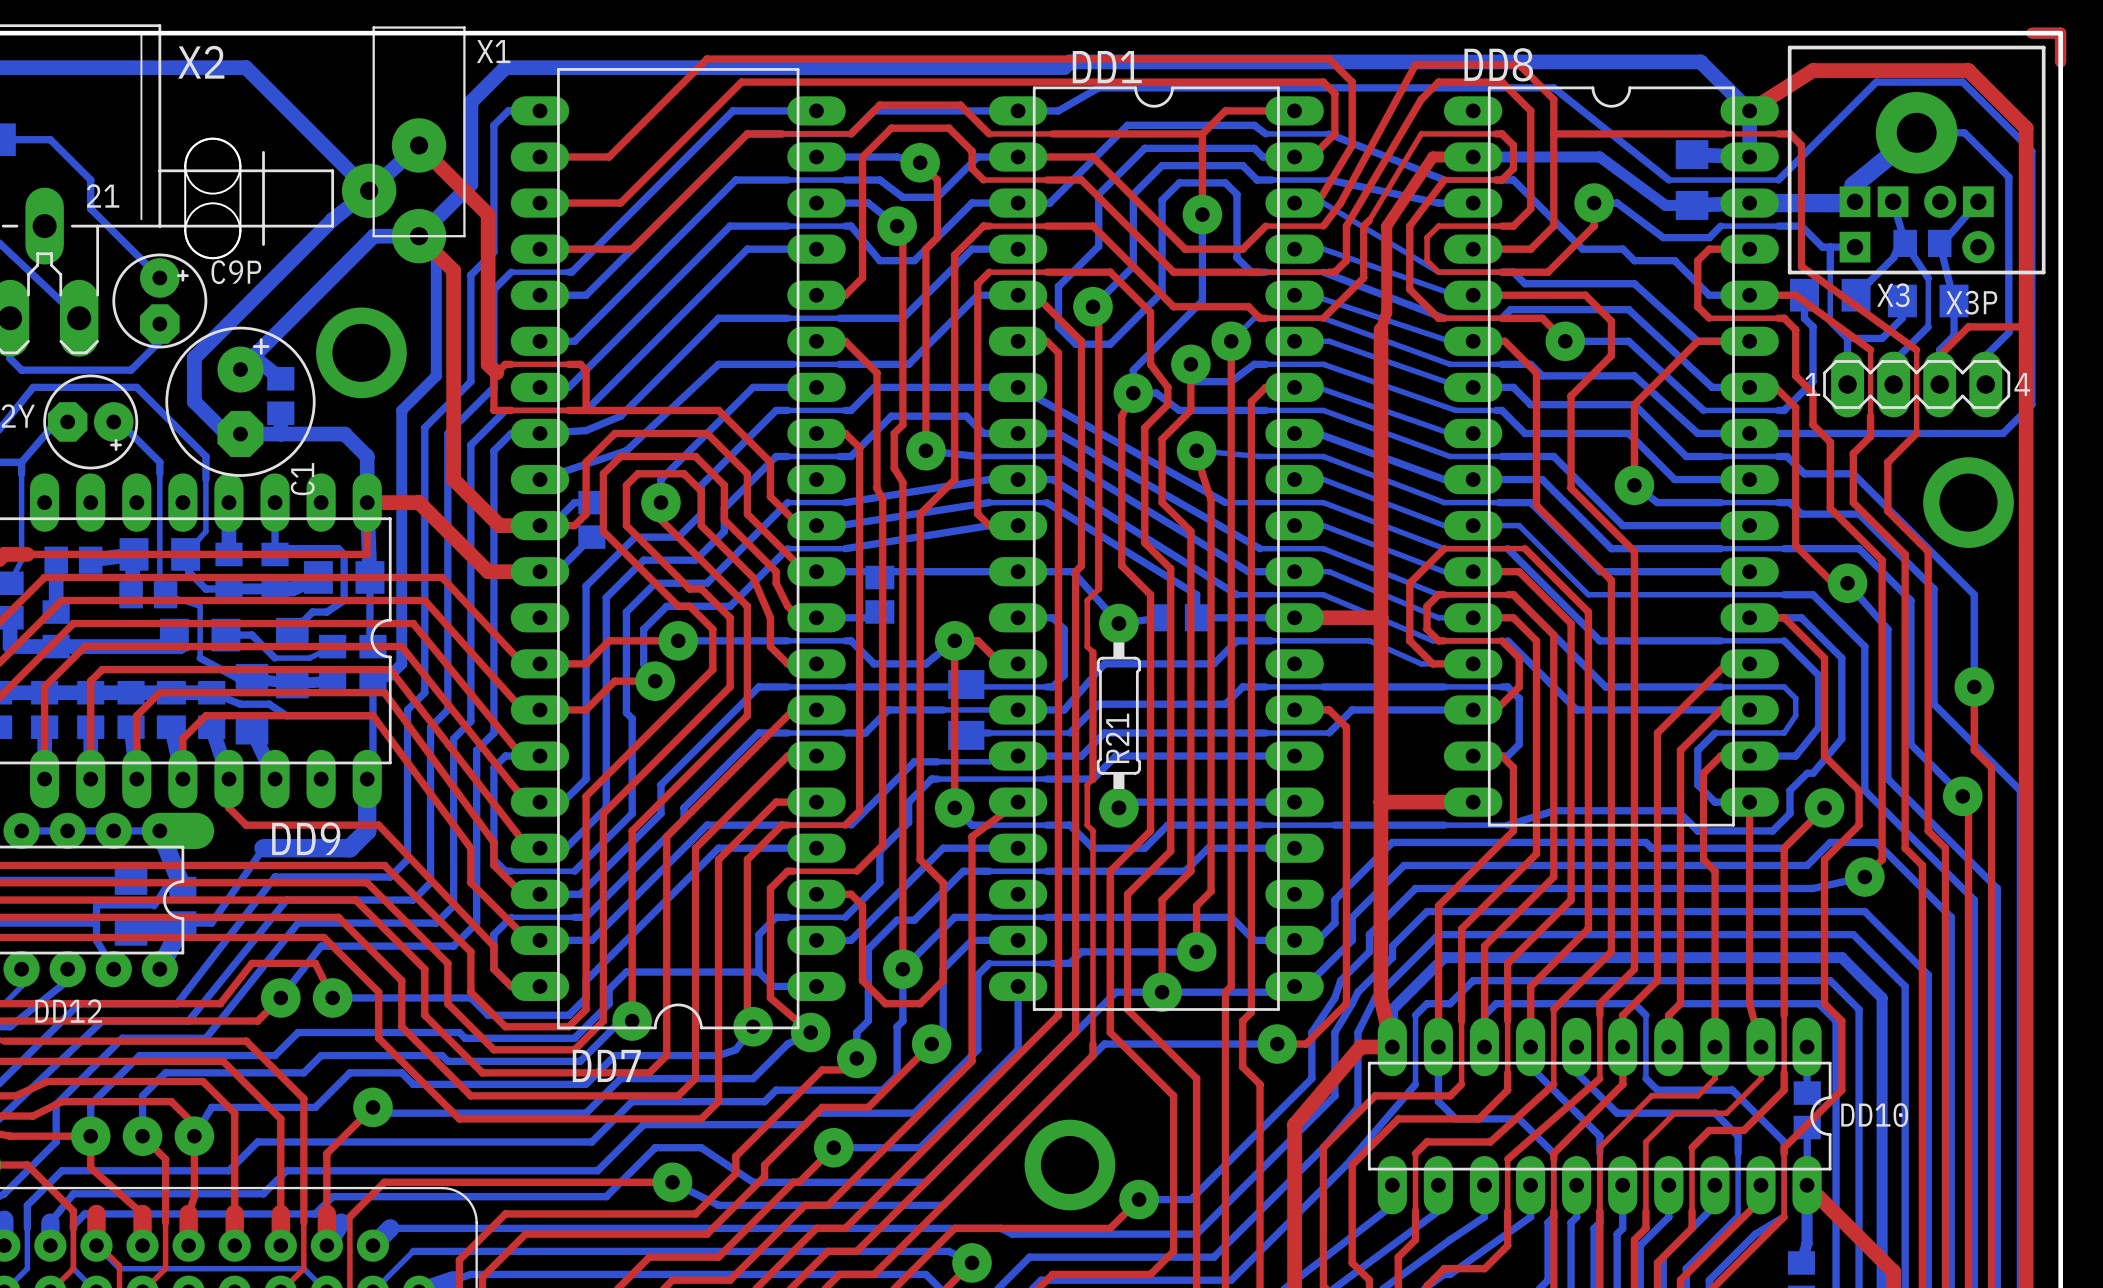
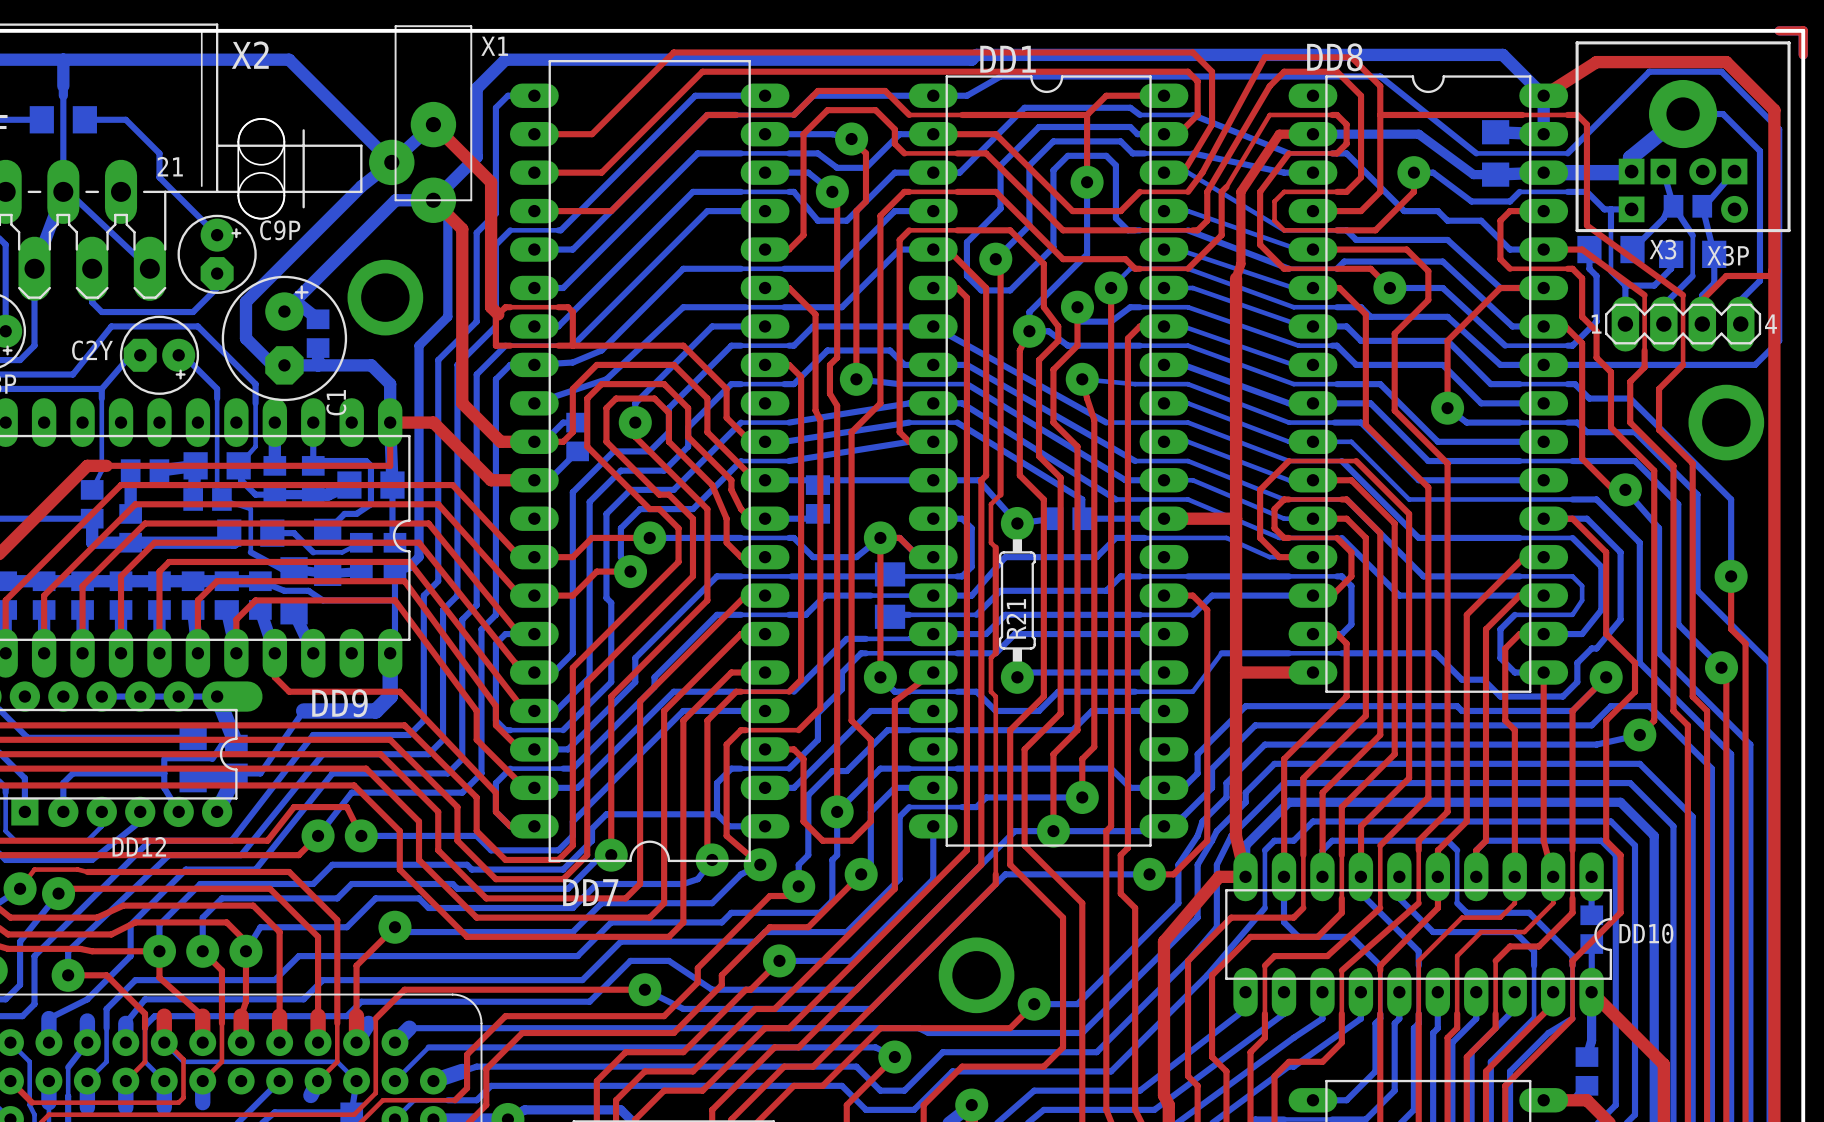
bottom track: (1651, 810) (1553, 810) (1507, 825) (1329, 825) -> (1461, 679) (1435, 653) (1221, 653) (1192, 691)

